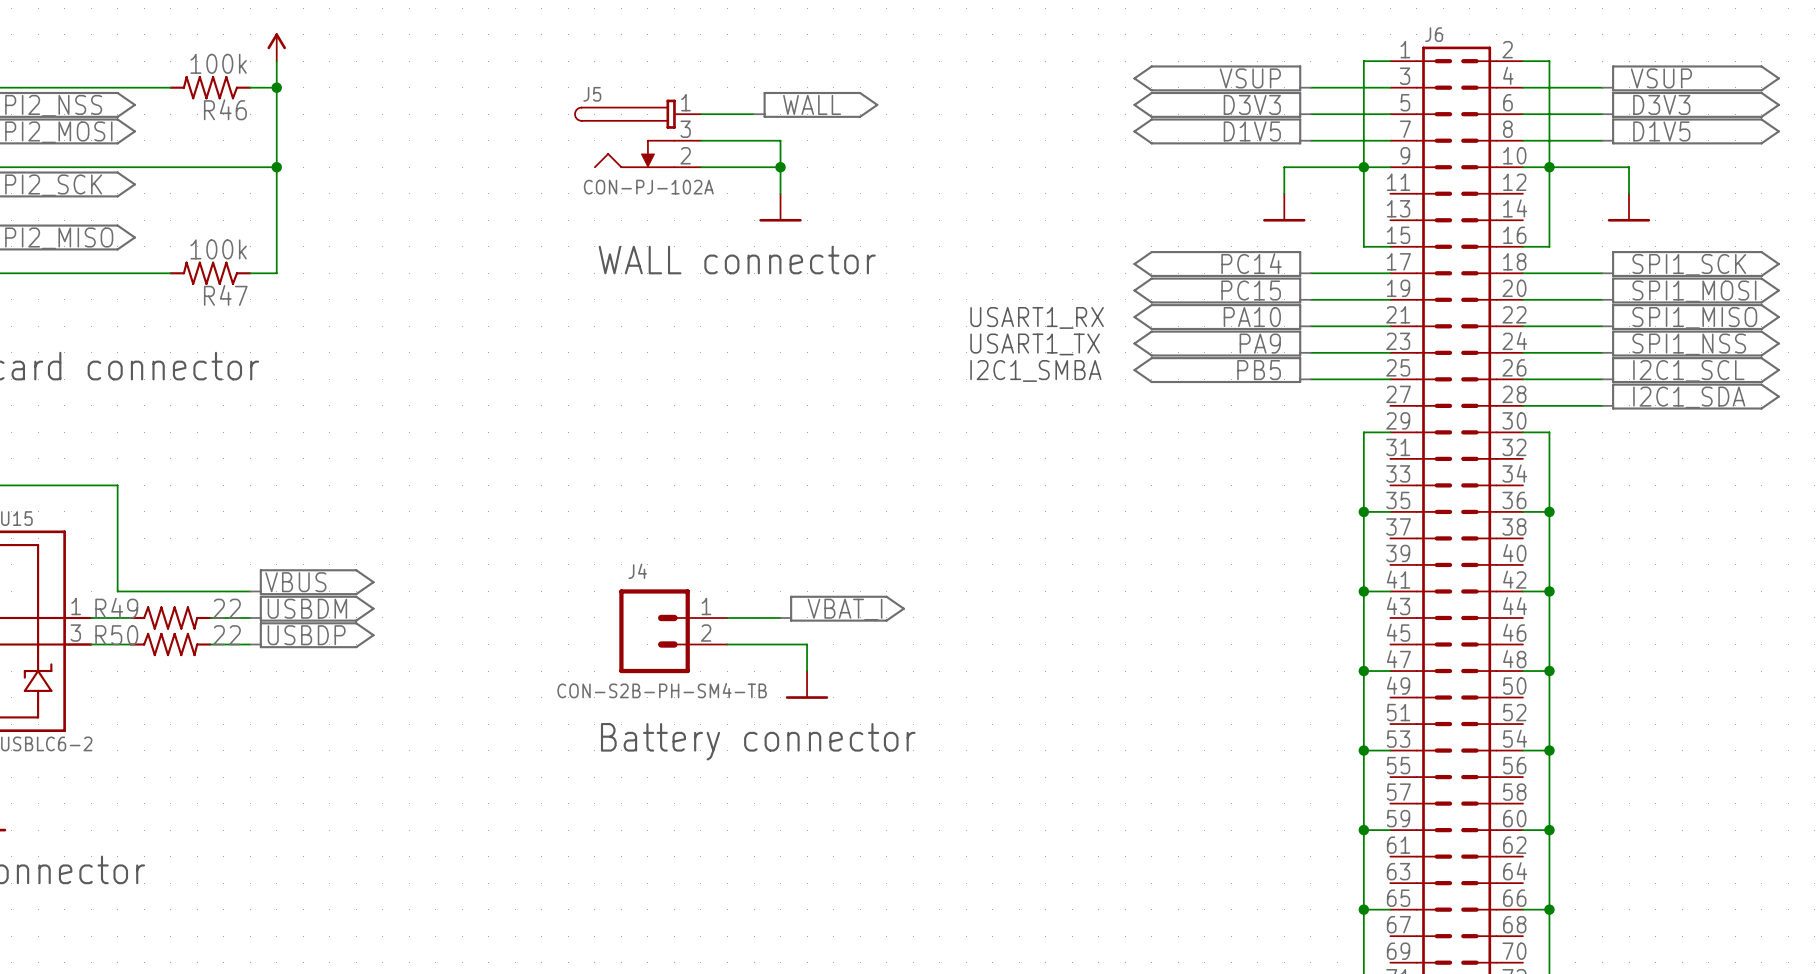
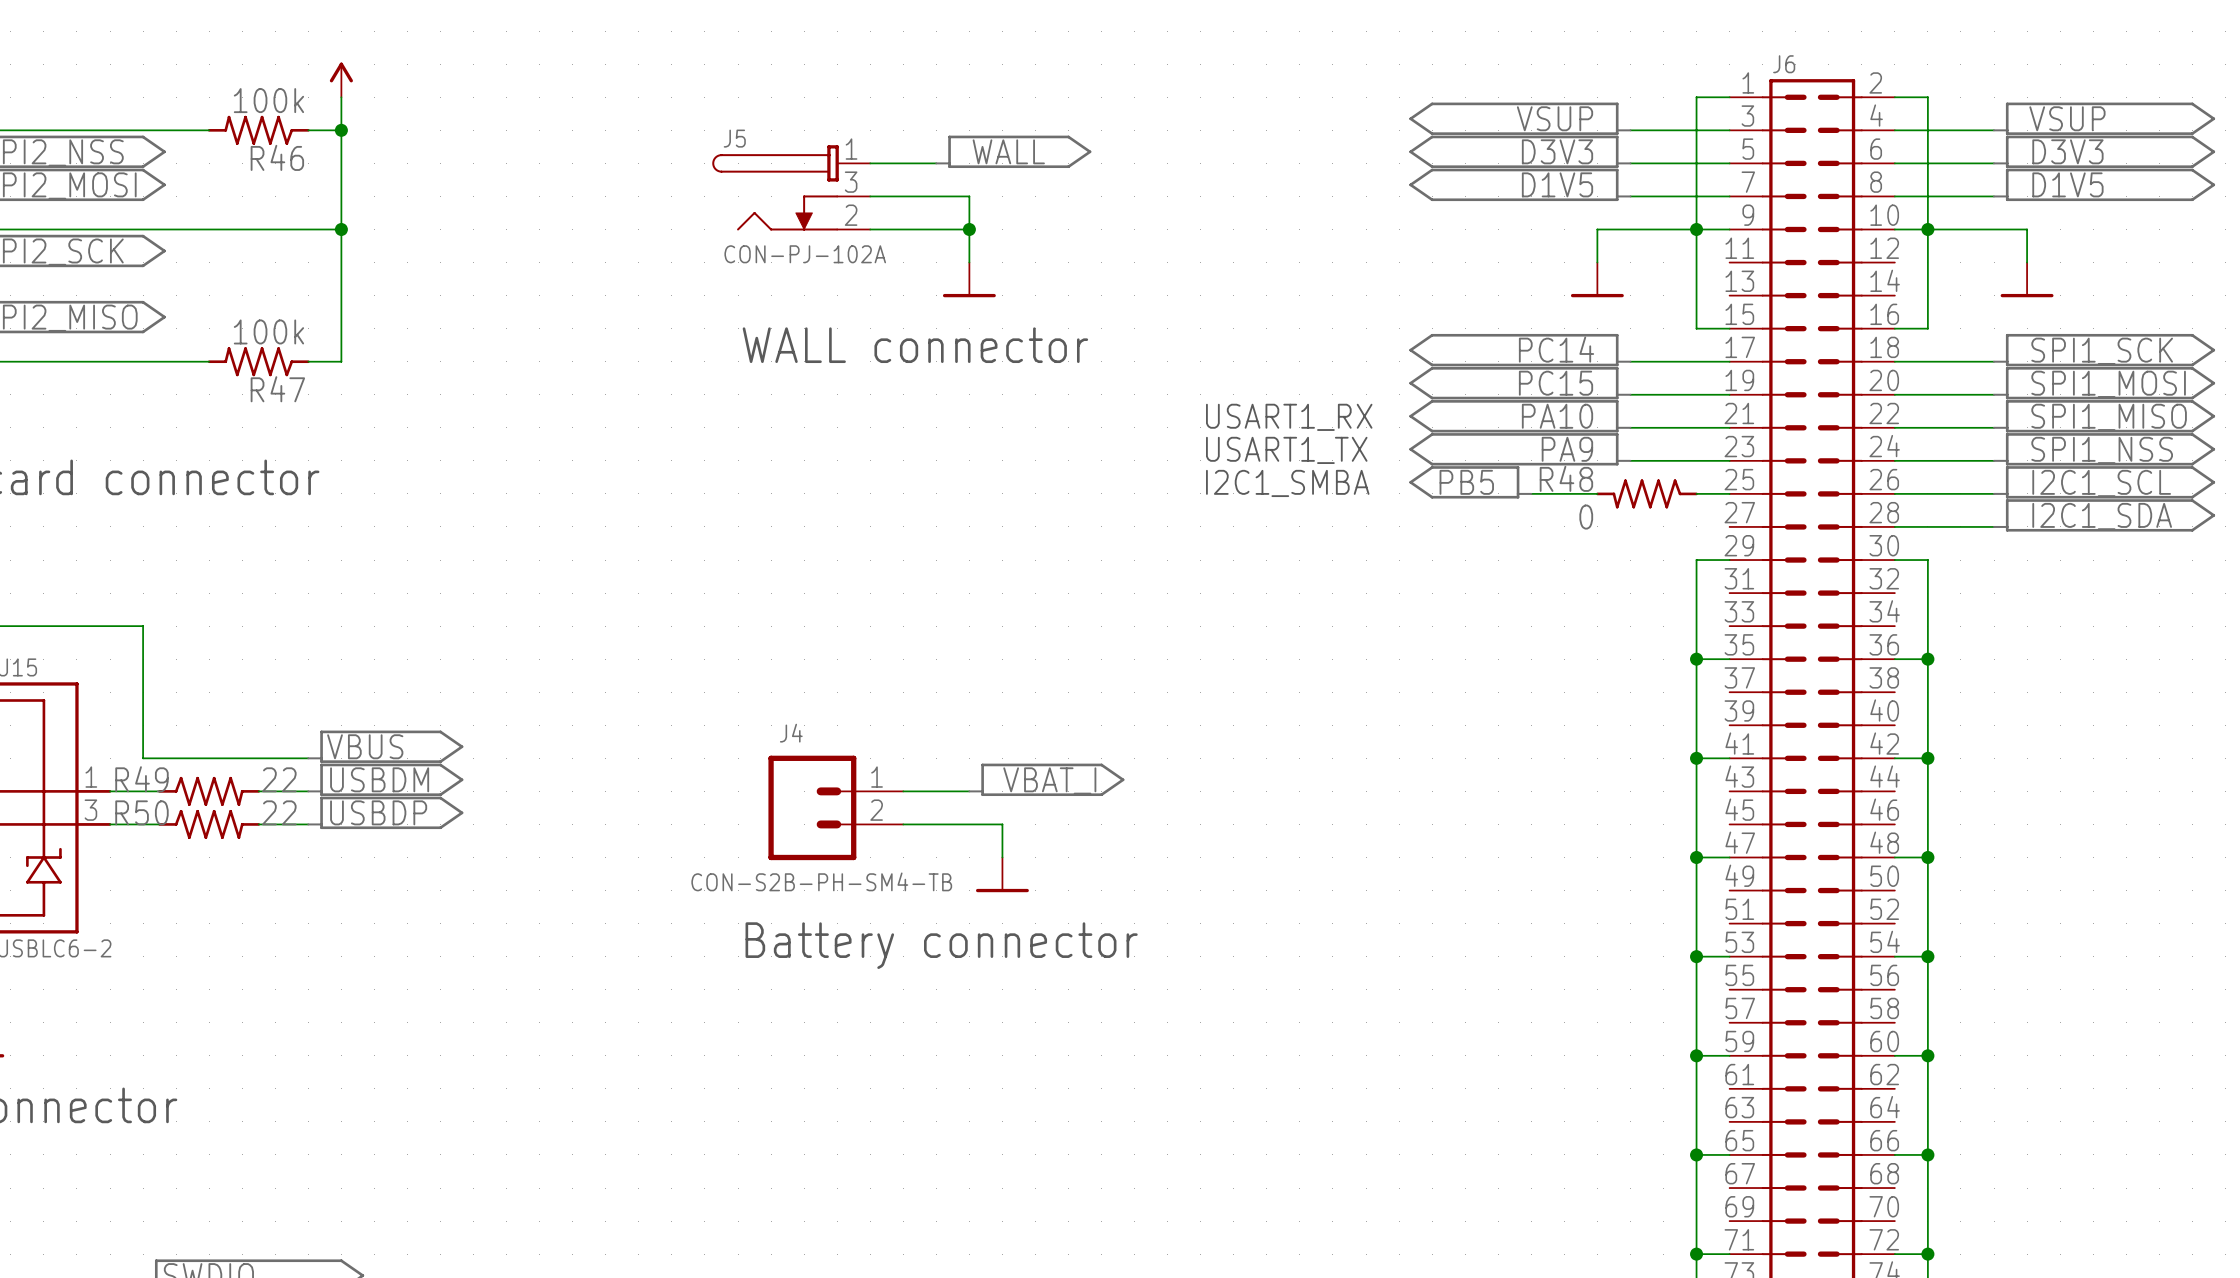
part: none -> (1470, 482)
part: (1222, 370) -> none
label position: PB5 (1259, 370) -> PB5 (1466, 482)
wire: (1310, 379) (1363, 379) -> (1531, 493) (1597, 493)
R48: none -> 0 (1646, 493)

